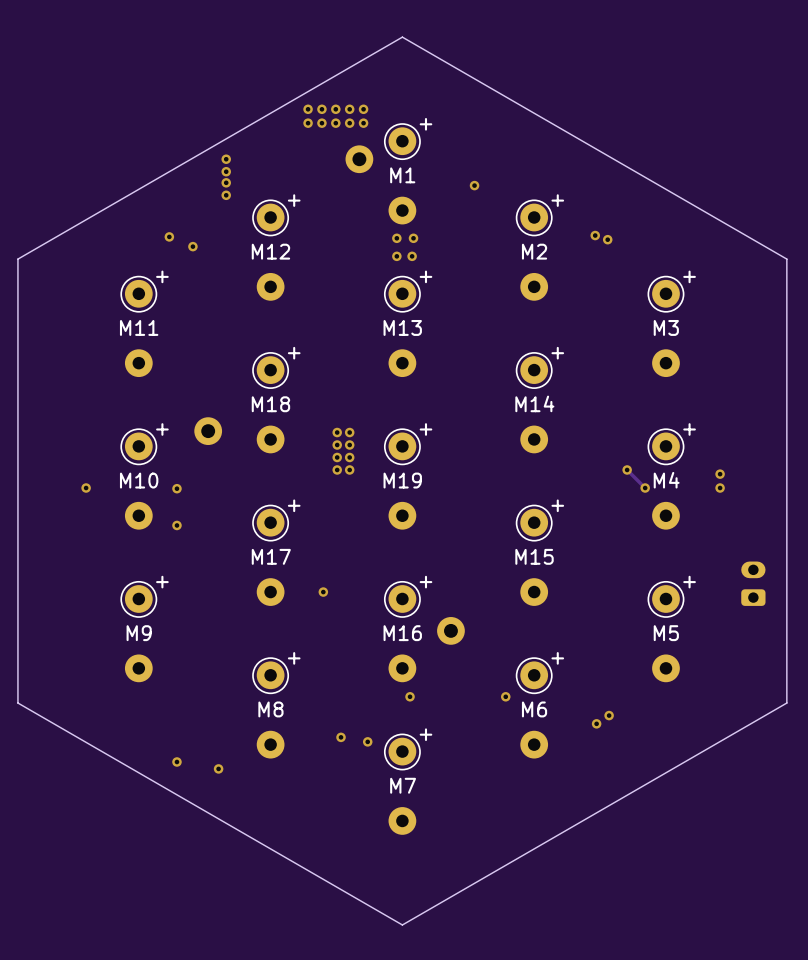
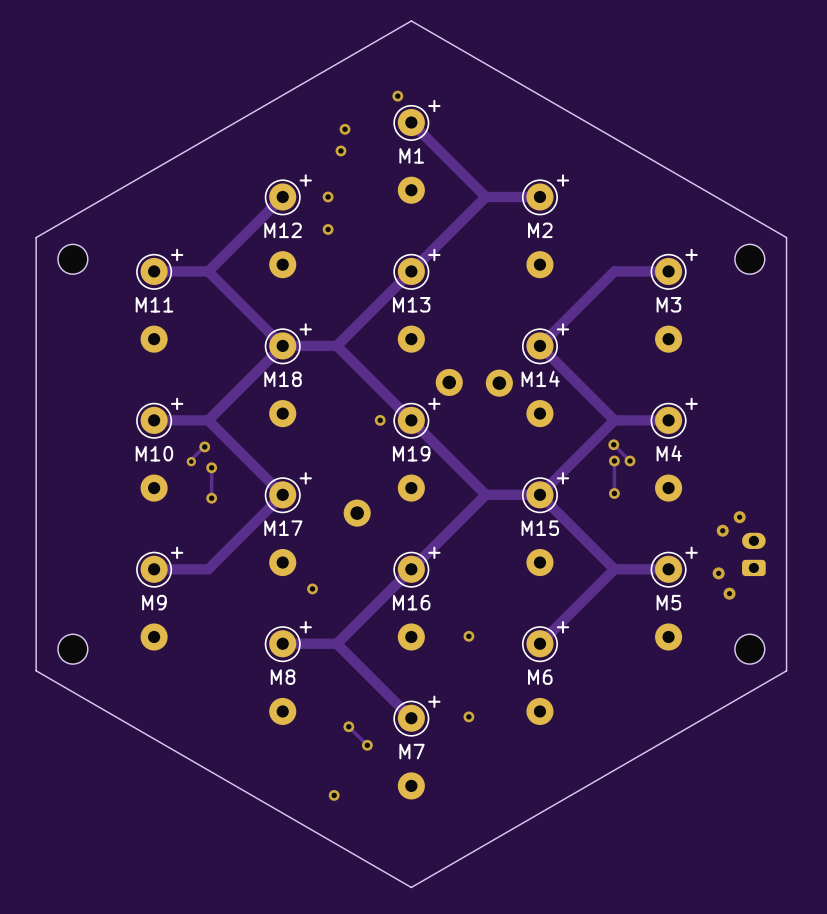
via: (308, 109) -> none
via: (321, 109) -> none
via: (335, 109) -> none
via: (349, 109) -> none
via: (363, 109) -> none
via: none -> (397, 96)
via: (308, 123) -> none
via: (321, 123) -> none
via: (335, 123) -> none
via: (349, 123) -> none
via: (363, 123) -> none
track: none -> (411, 122) (485, 196)
via: none -> (345, 129)
via: (226, 159) -> none
part: (359, 159) -> none
via: none -> (340, 150)
via: (226, 171) -> none
via: (226, 182) -> none
via: (474, 185) -> none
via: (226, 195) -> none
track: none -> (282, 196) (208, 271)
via: none -> (328, 196)
track: none -> (485, 196) (539, 196)
track: none -> (485, 196) (336, 345)
via: (595, 235) -> none
via: (169, 236) -> none
via: (396, 238) -> none
via: (413, 238) -> none
via: (607, 239) -> none
via: (192, 246) -> none
via: none -> (328, 229)
via: (396, 256) -> none
via: (412, 256) -> none
part: none -> (72, 259)
part: none -> (749, 259)
track: none -> (154, 271) (208, 271)
track: none -> (208, 271) (282, 345)
track: none -> (668, 271) (614, 271) (539, 345) (614, 420)
track: none -> (282, 345) (336, 345)
track: none -> (282, 345) (208, 420)
track: none -> (336, 345) (485, 494)
part: none -> (449, 382)
part: none -> (499, 383)
part: (208, 431) -> none
via: (337, 432) -> none
via: (349, 432) -> none
via: (337, 445) -> none
via: (349, 445) -> none
track: none -> (154, 420) (208, 420)
track: none -> (208, 420) (282, 494) (208, 569) (154, 569)
via: none -> (380, 420)
track: none -> (614, 420) (539, 494)
track: none -> (614, 420) (668, 420)
via: (337, 457) -> none
via: (349, 457) -> none
via: (337, 469) -> none
via: (349, 469) -> none
track: (627, 469) (645, 488) -> none
via: (627, 469) -> none
track: none -> (613, 444) (630, 460)
via: none -> (613, 444)
track: none -> (204, 446) (189, 460)
via: none -> (204, 446)
via: (720, 474) -> none
via: (86, 488) -> none
track: none -> (614, 460) (614, 493)
via: none -> (614, 460)
via: none -> (630, 460)
via: (645, 488) -> none
via: (720, 488) -> none
track: none -> (211, 467) (211, 498)
via: none -> (211, 467)
via: none -> (614, 493)
track: none -> (485, 494) (539, 494)
track: none -> (485, 494) (336, 643)
track: none -> (539, 494) (614, 569)
via: (176, 525) -> none
via: none -> (211, 498)
part: none -> (357, 513)
via: none -> (739, 517)
via: none -> (722, 530)
via: (323, 592) -> none
track: none -> (614, 569) (668, 569)
track: none -> (614, 569) (539, 643)
via: none -> (718, 573)
via: none -> (312, 588)
via: none -> (729, 593)
part: (450, 630) -> none
via: none -> (468, 636)
track: none -> (282, 643) (336, 643)
track: none -> (336, 643) (411, 718)
part: none -> (72, 649)
part: none -> (749, 649)
via: (410, 696) -> none
via: (505, 696) -> none
via: (609, 715) -> none
via: (596, 723) -> none
via: (341, 737) -> none
via: (367, 741) -> none
via: none -> (468, 716)
track: none -> (348, 726) (367, 745)
via: none -> (348, 726)
via: (176, 761) -> none
via: (218, 768) -> none
via: none -> (367, 745)
via: none -> (334, 795)

